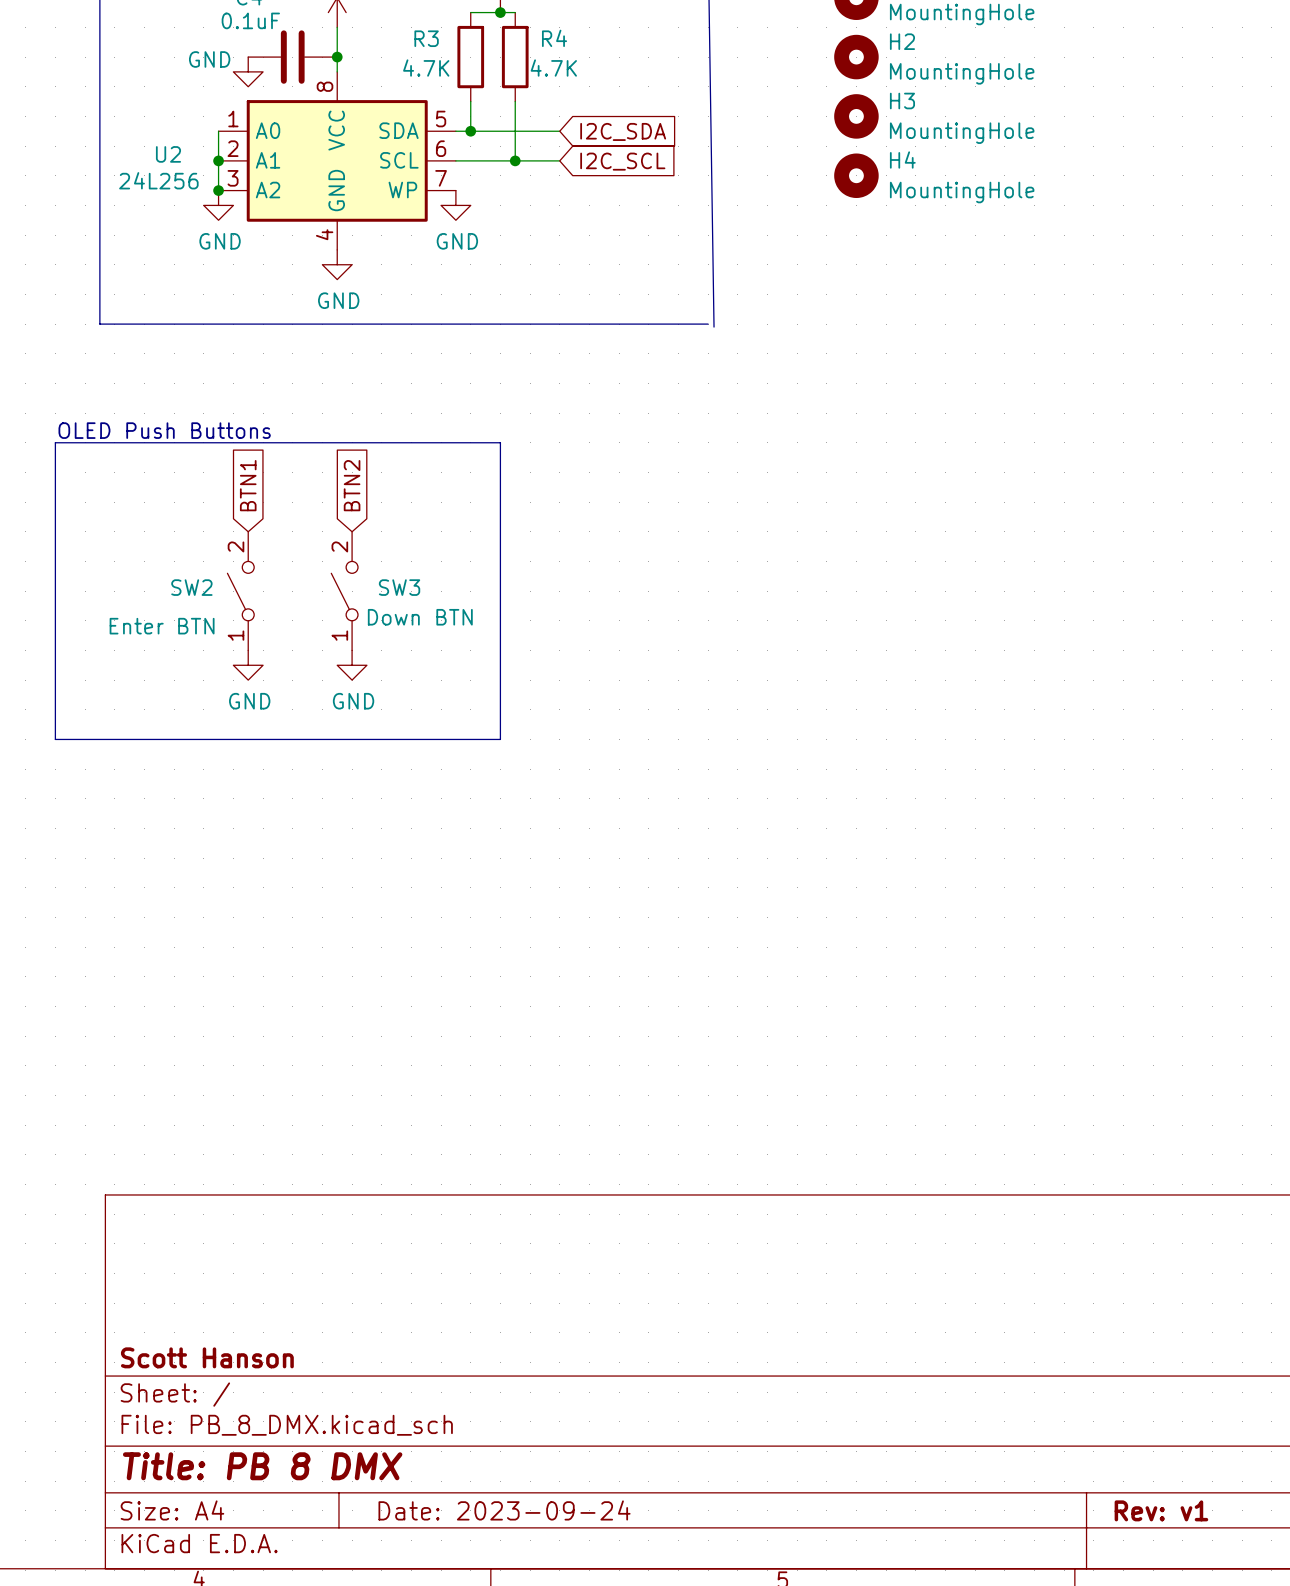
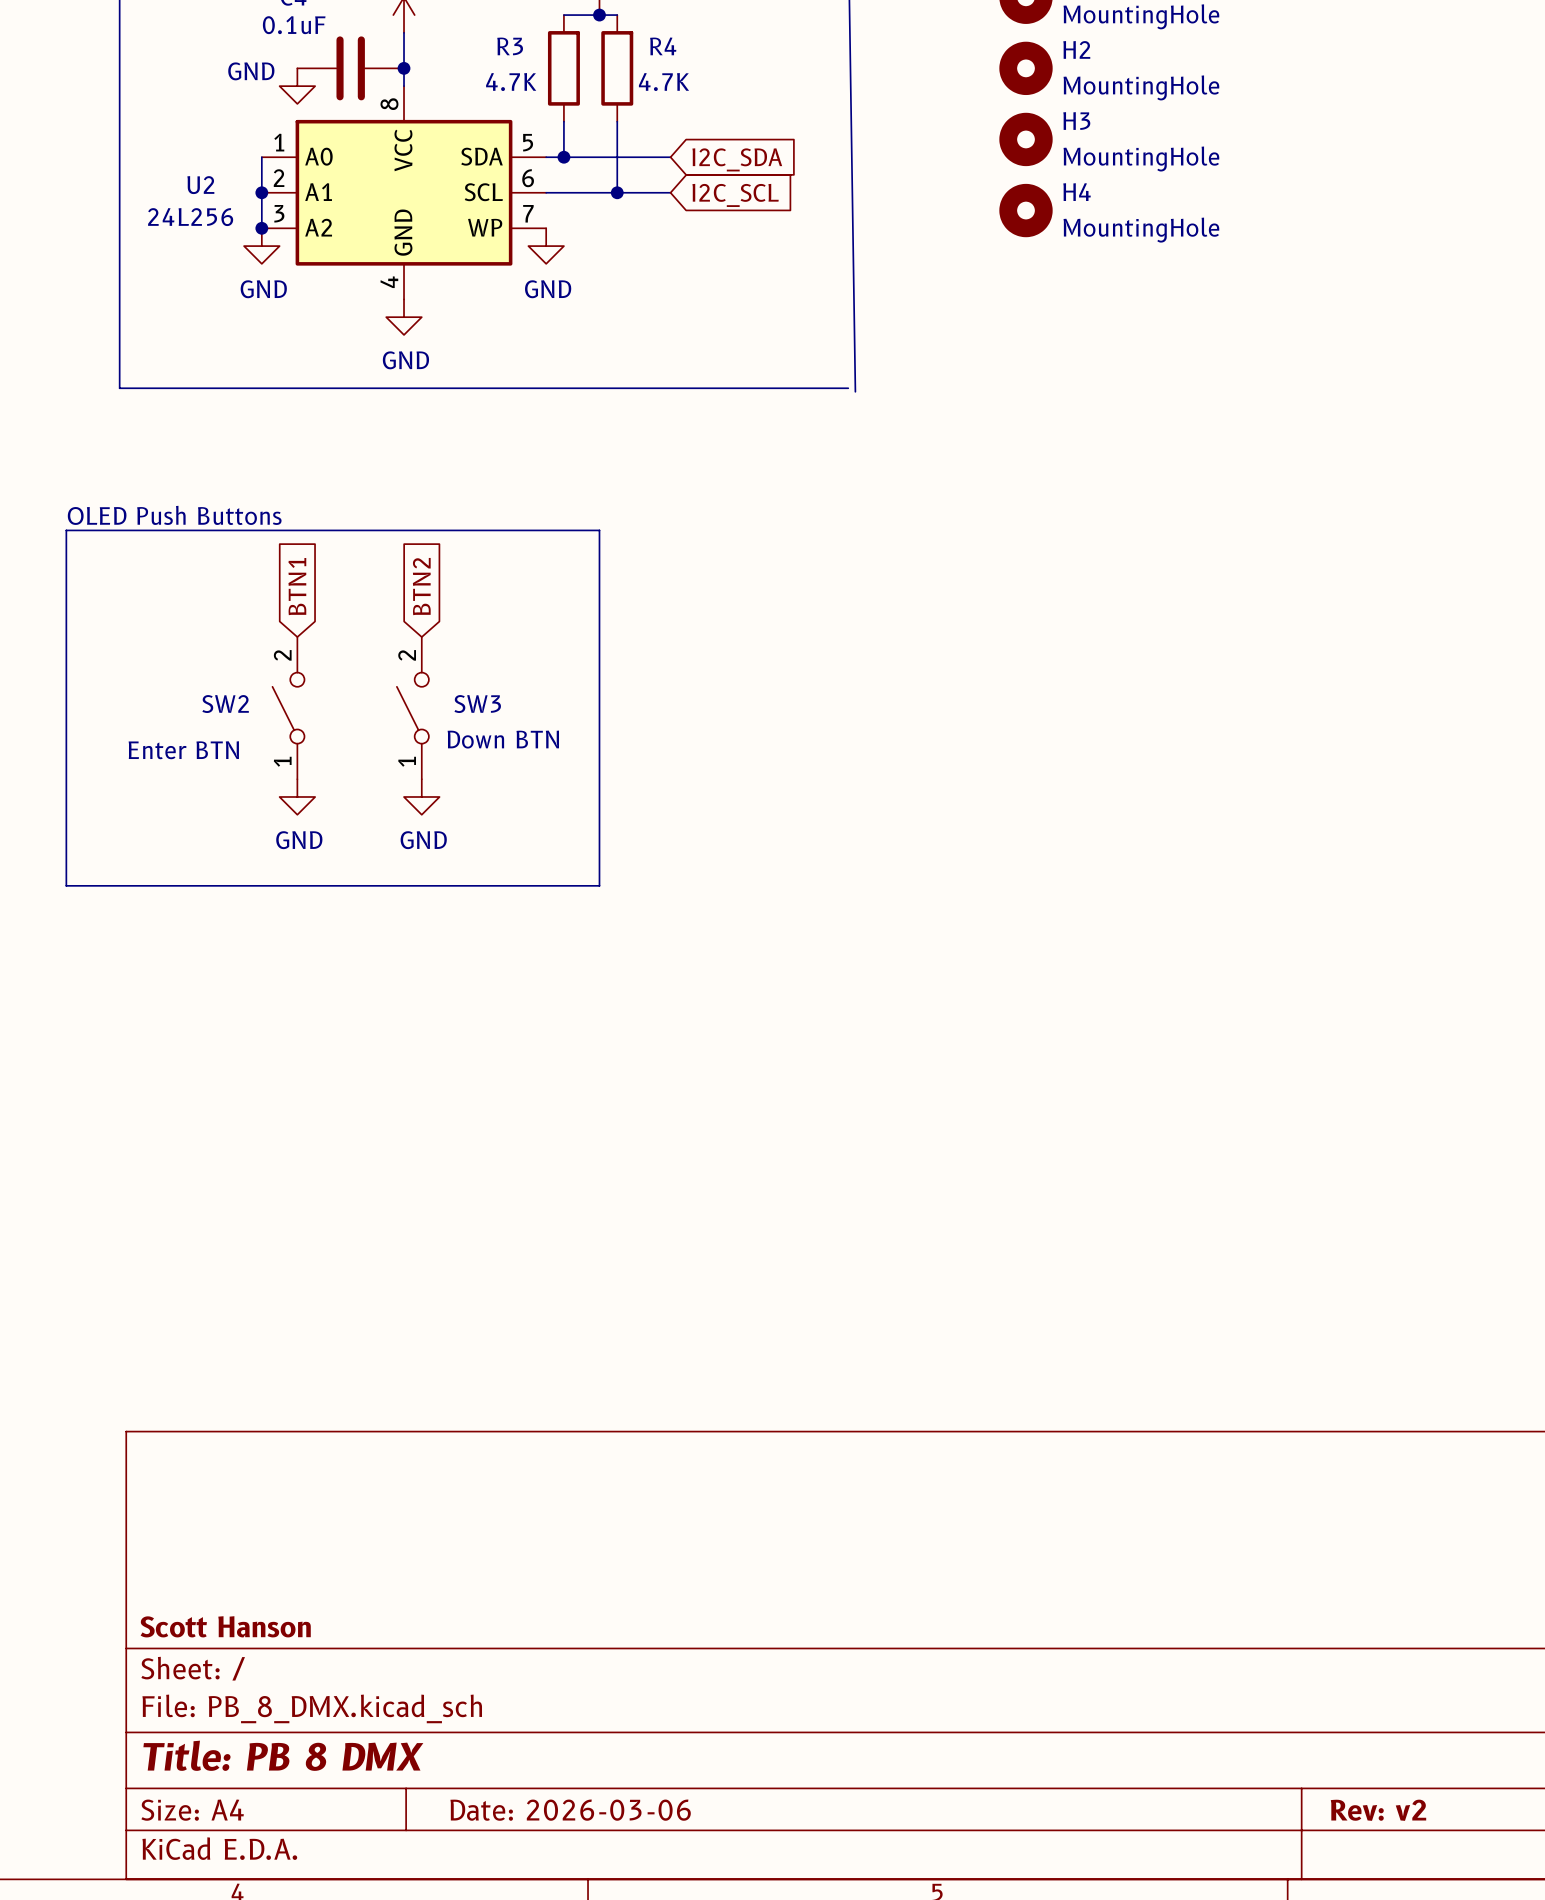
title block: Date: 2023-09-24 (504, 1510) -> Date: 2026-03-06 (570, 1810)
title block: Rev: v1 (1161, 1510) -> Rev: v2 (1378, 1810)

